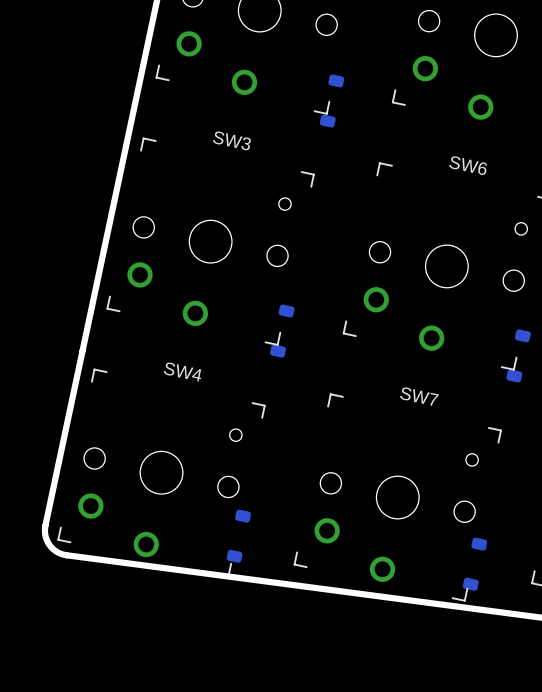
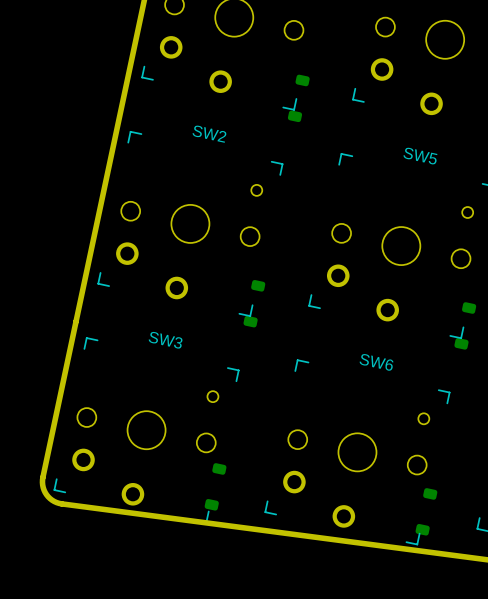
SW3 name: SW3 (232, 140) -> SW2 (209, 134)
SW6 name: SW6 (468, 165) -> SW5 (420, 156)
SW4 name: SW4 (182, 371) -> SW3 (165, 340)
SW7 name: SW7 (419, 396) -> SW6 (376, 362)

